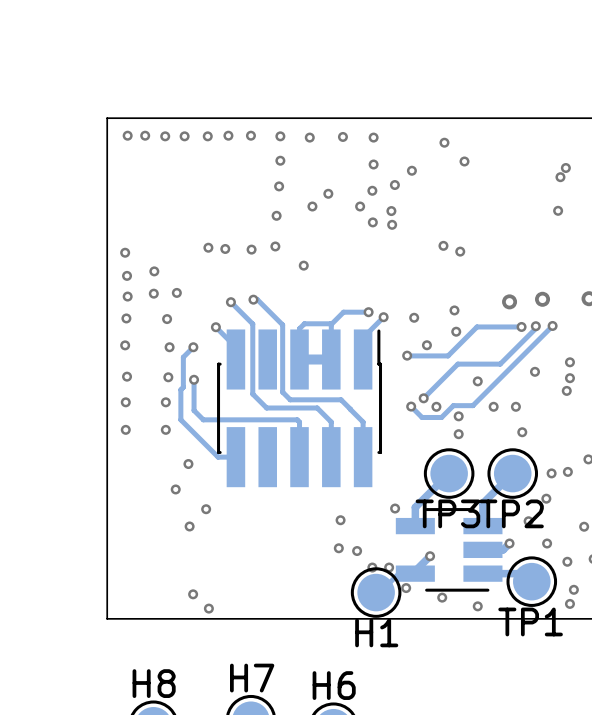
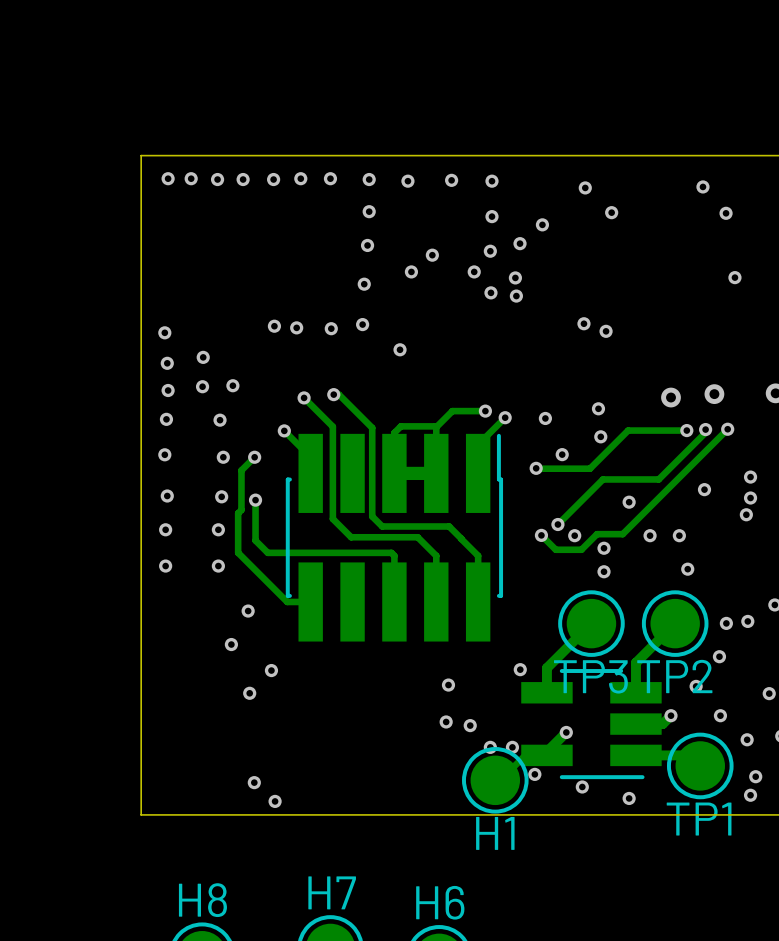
via: none -> (702, 186)
via: none -> (726, 213)
via: (565, 168) -> none
via: (560, 177) -> none

